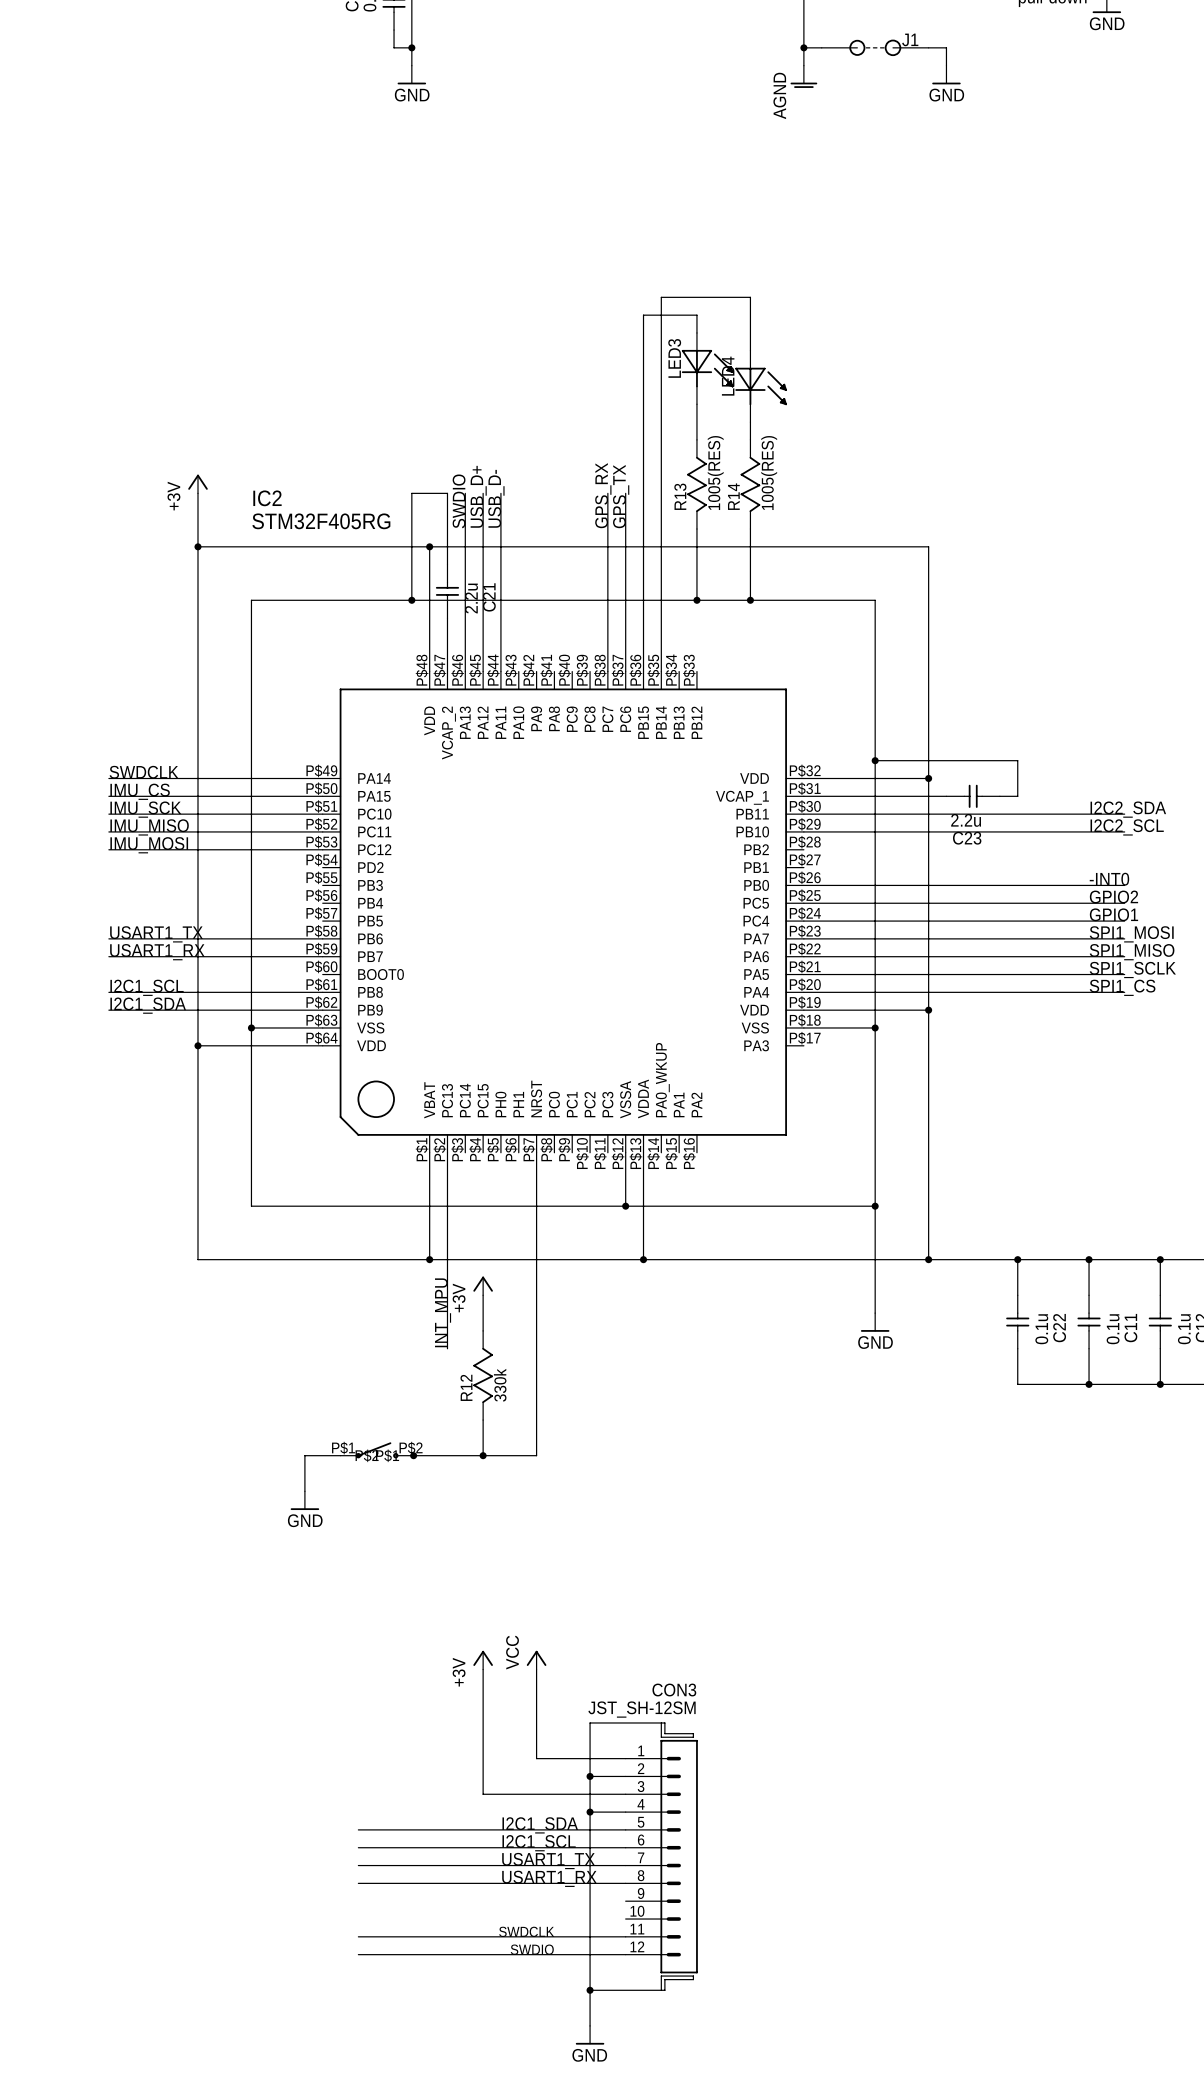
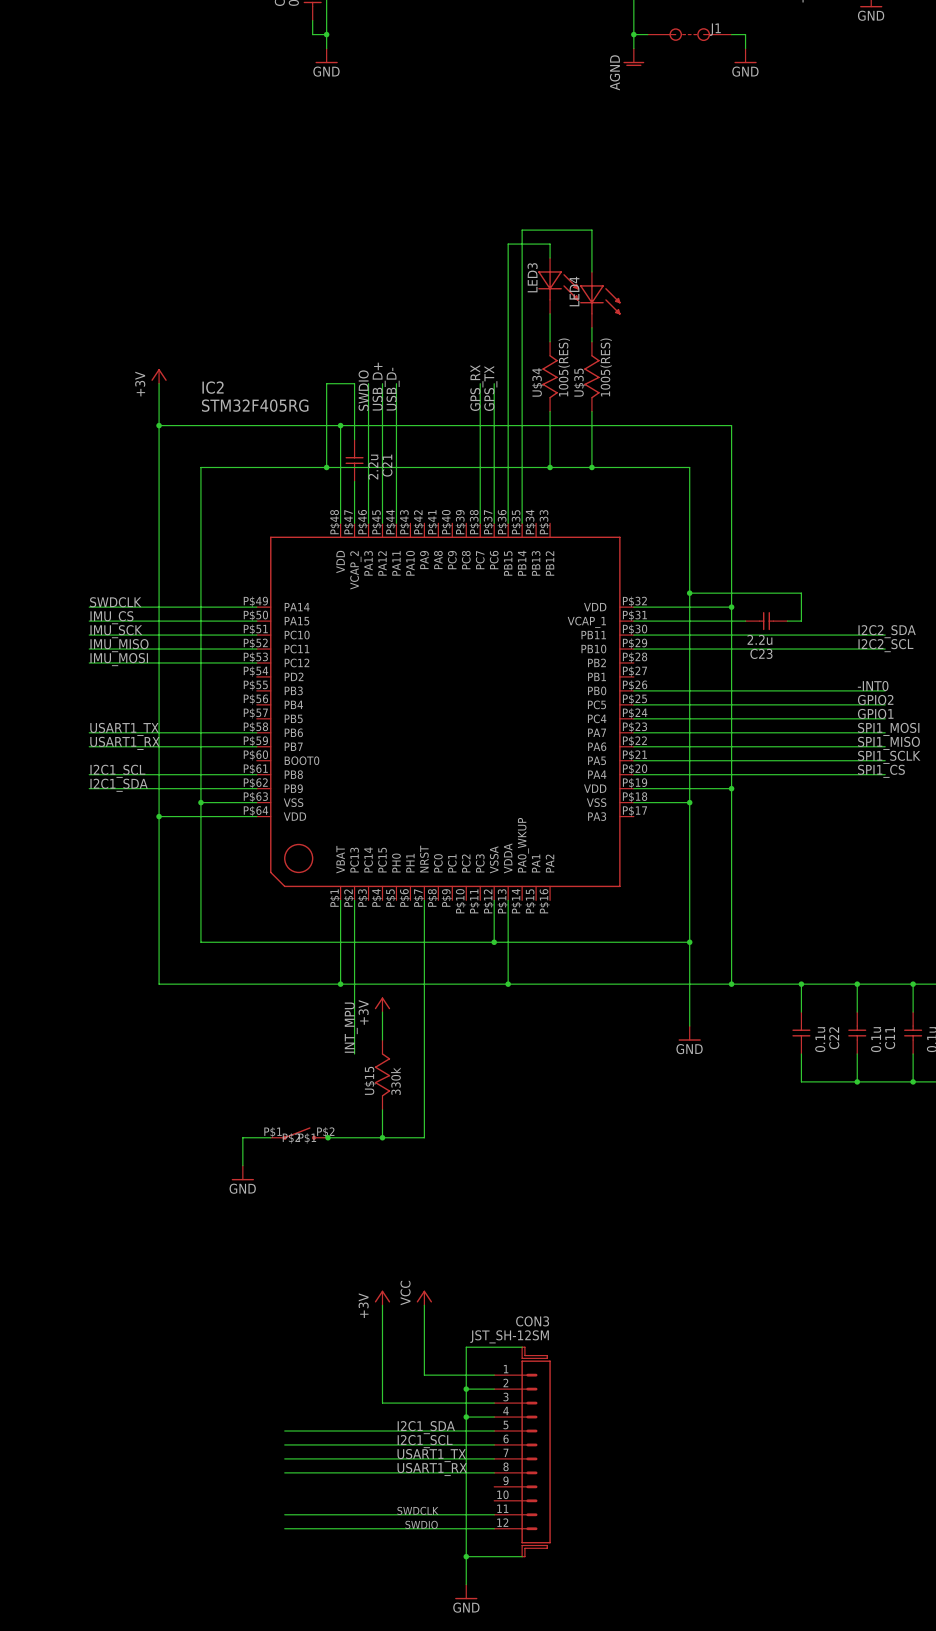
R13 name: R13 (680, 496) -> U$34 (537, 382)
R14 name: R14 (733, 496) -> U$35 (579, 382)
R12 name: R12 (466, 1387) -> U$15 (370, 1080)

